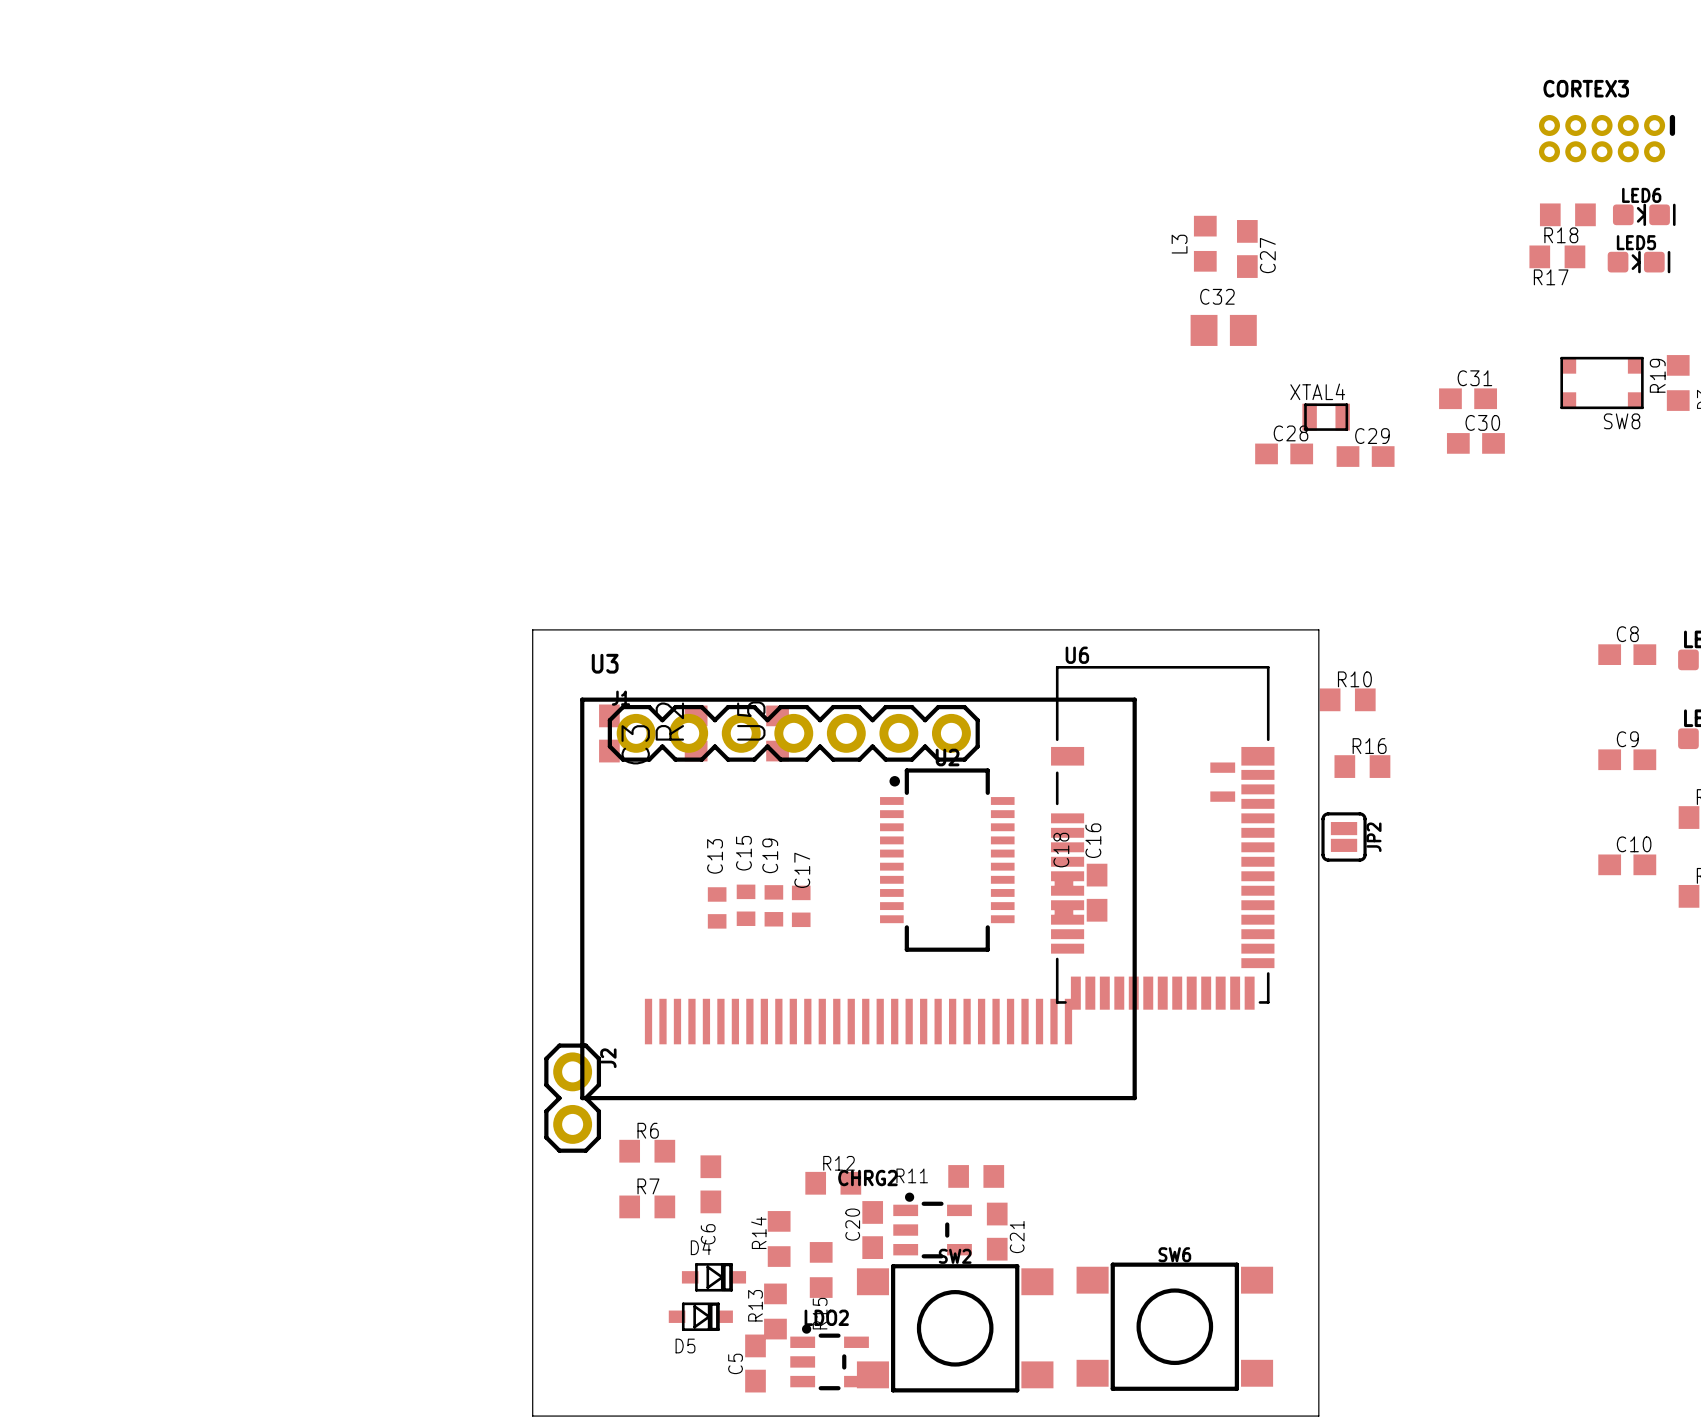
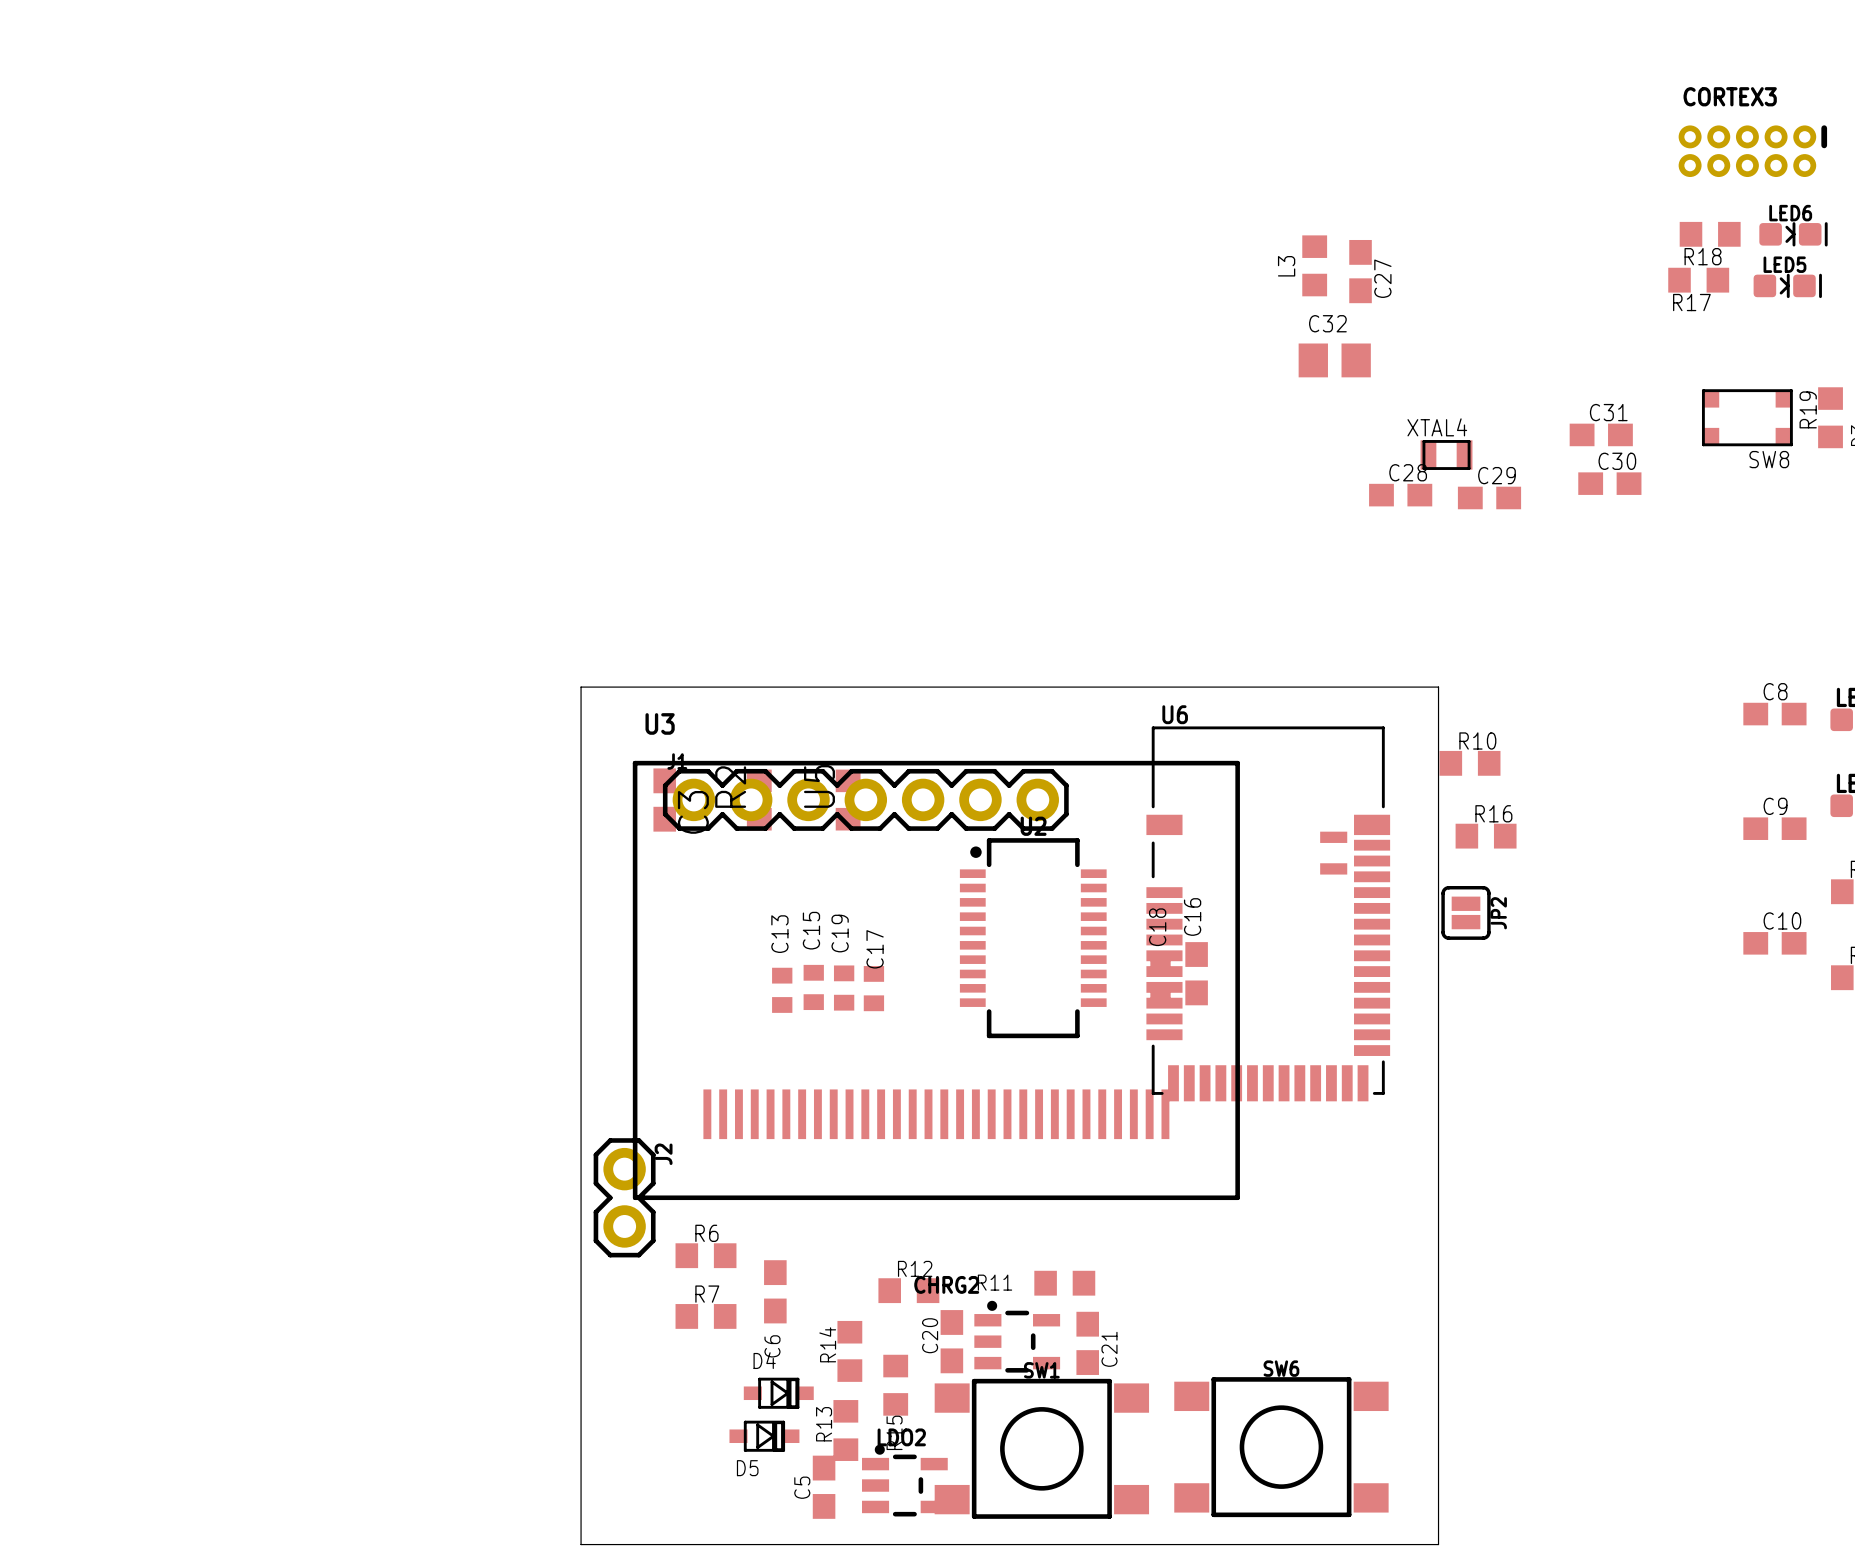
SW2 name: SW2 (955, 1256) -> SW1 (1041, 1370)

